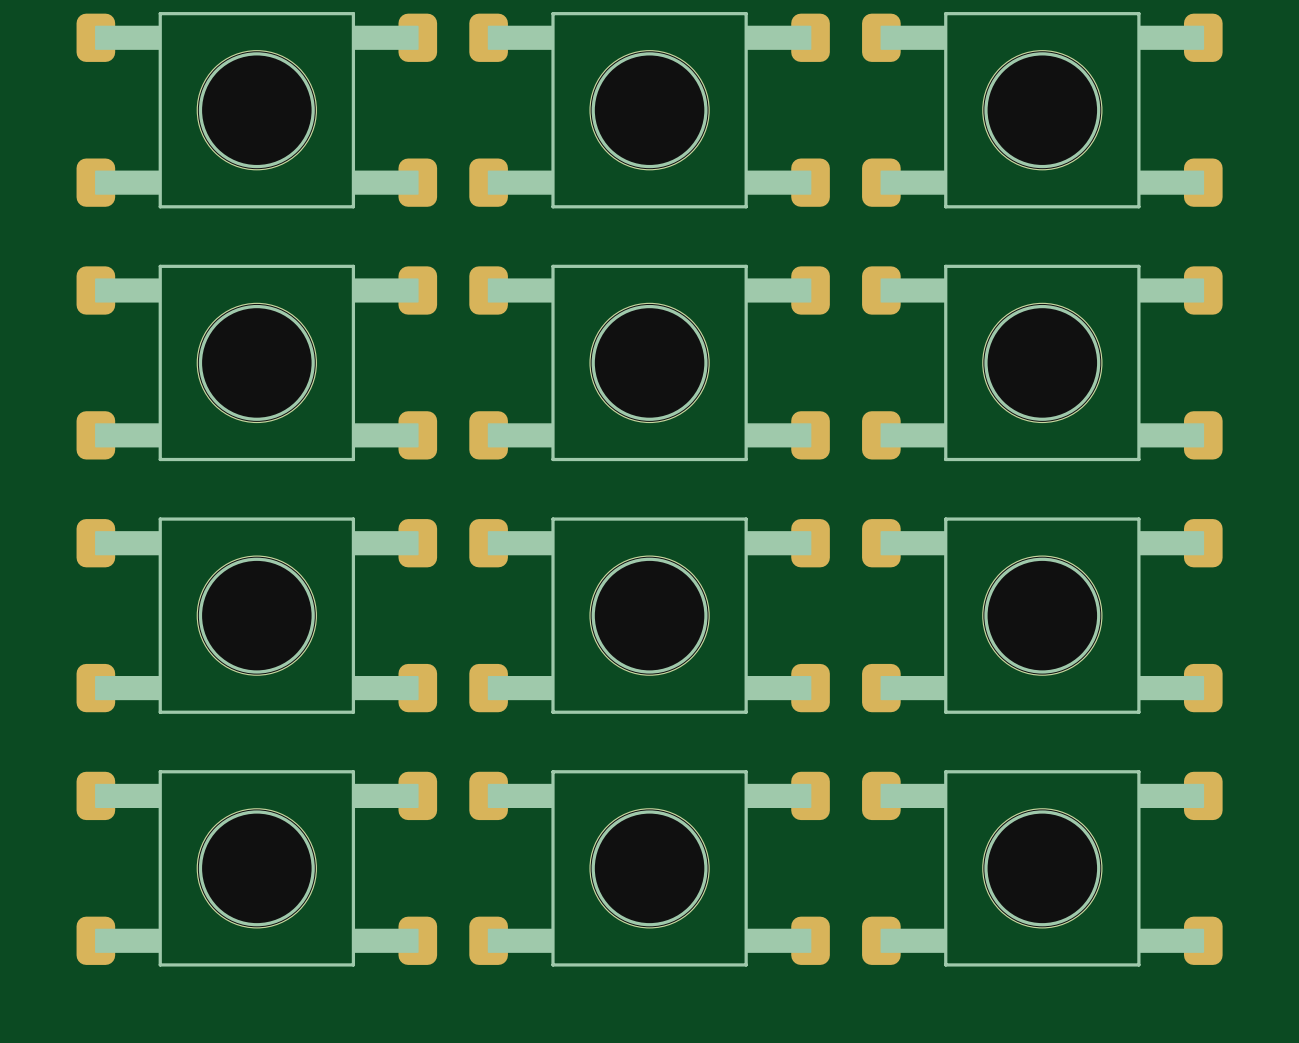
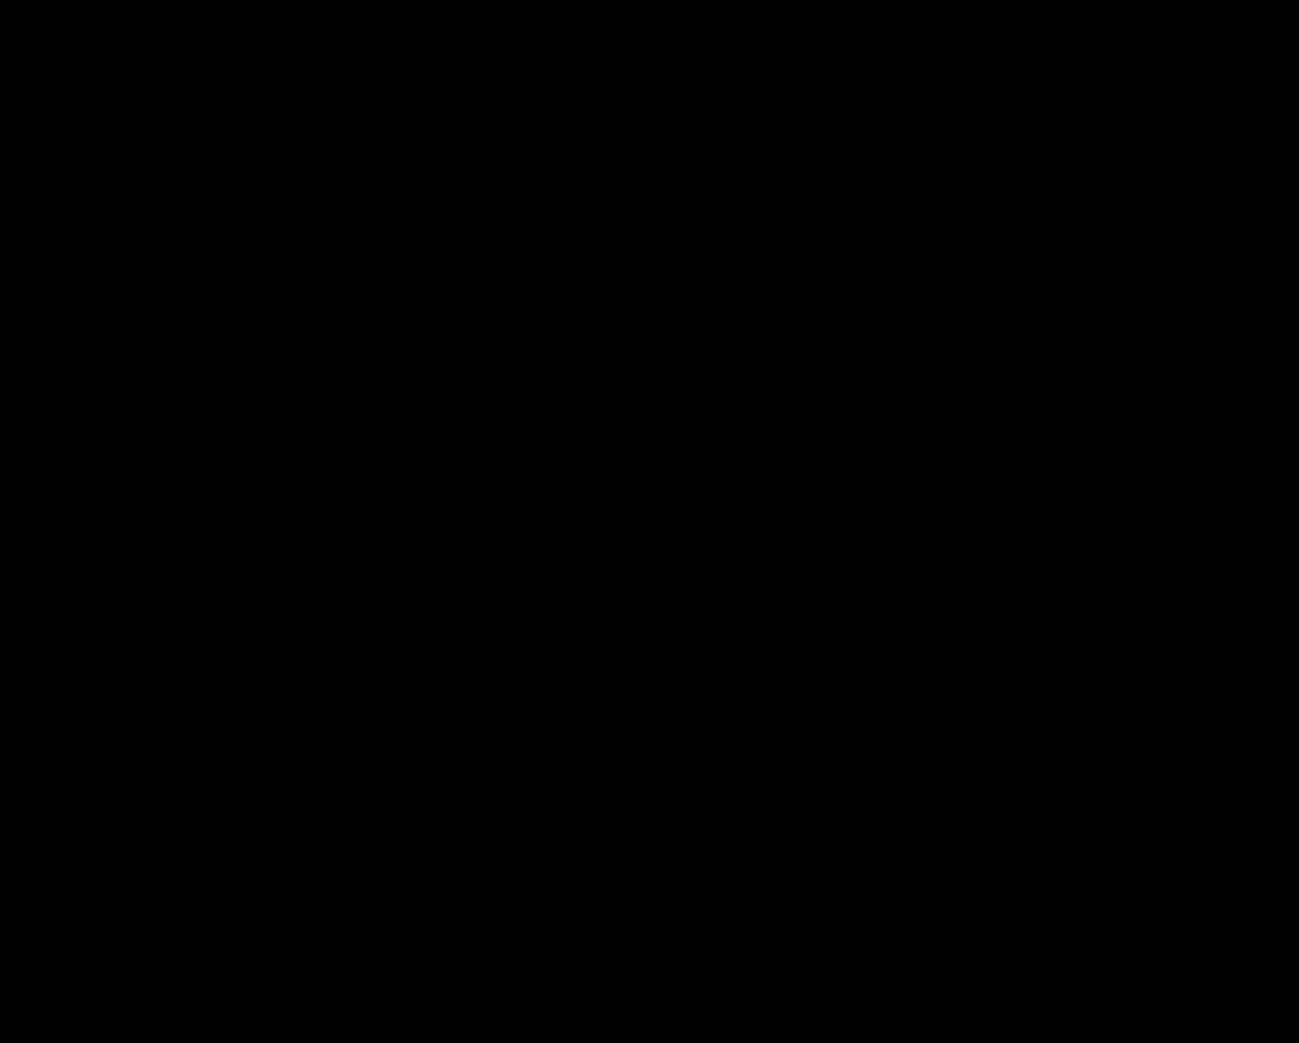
part: (256, 110) -> none
part: (649, 110) -> none
part: (1042, 110) -> none
part: (256, 362) -> none
part: (649, 362) -> none
part: (1042, 362) -> none
part: (256, 615) -> none
part: (649, 615) -> none
part: (1042, 615) -> none
part: (256, 868) -> none
part: (649, 868) -> none
part: (1042, 868) -> none

